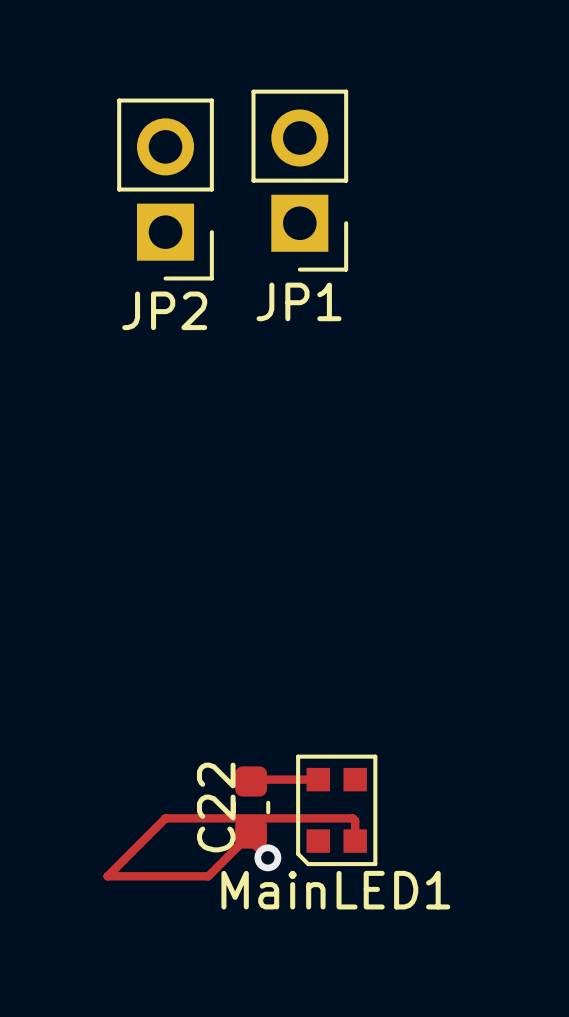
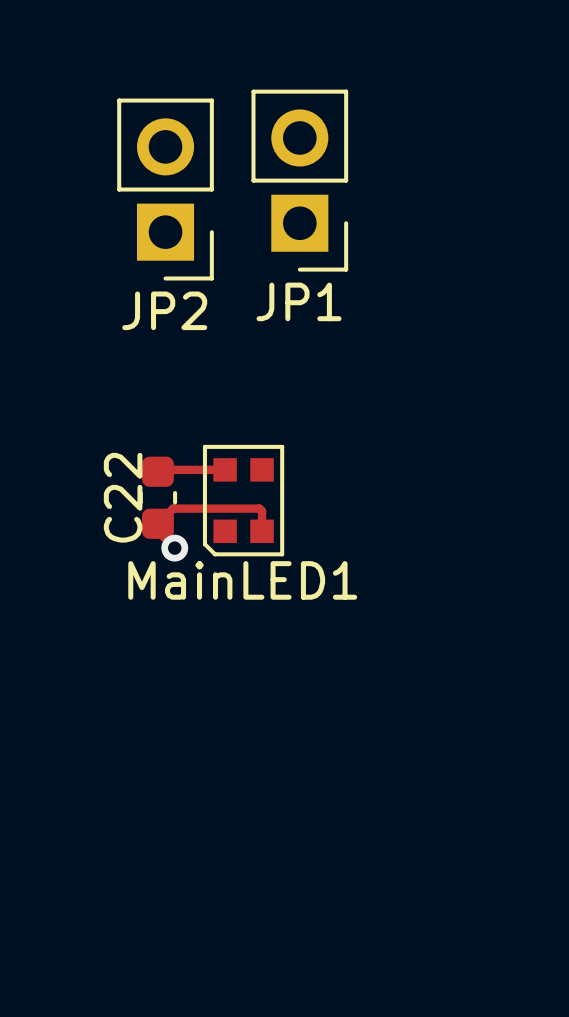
top track: none -> (262, 531) (262, 511) (259, 508) (173, 508) (157, 523) (157, 531) (174, 548)
via: none -> (174, 548)
top track: (318, 779) (252, 779) (251, 781) -> (225, 469) (159, 469) (157, 471)
C22 position: (251, 807) -> (157, 497)
MainLED1 position: (336, 810) -> (243, 500)
top track: (355, 841) (355, 820) (352, 818) (165, 818) (107, 876) (208, 876) (251, 833) (251, 841) (267, 857) -> none
via: (267, 857) -> none

